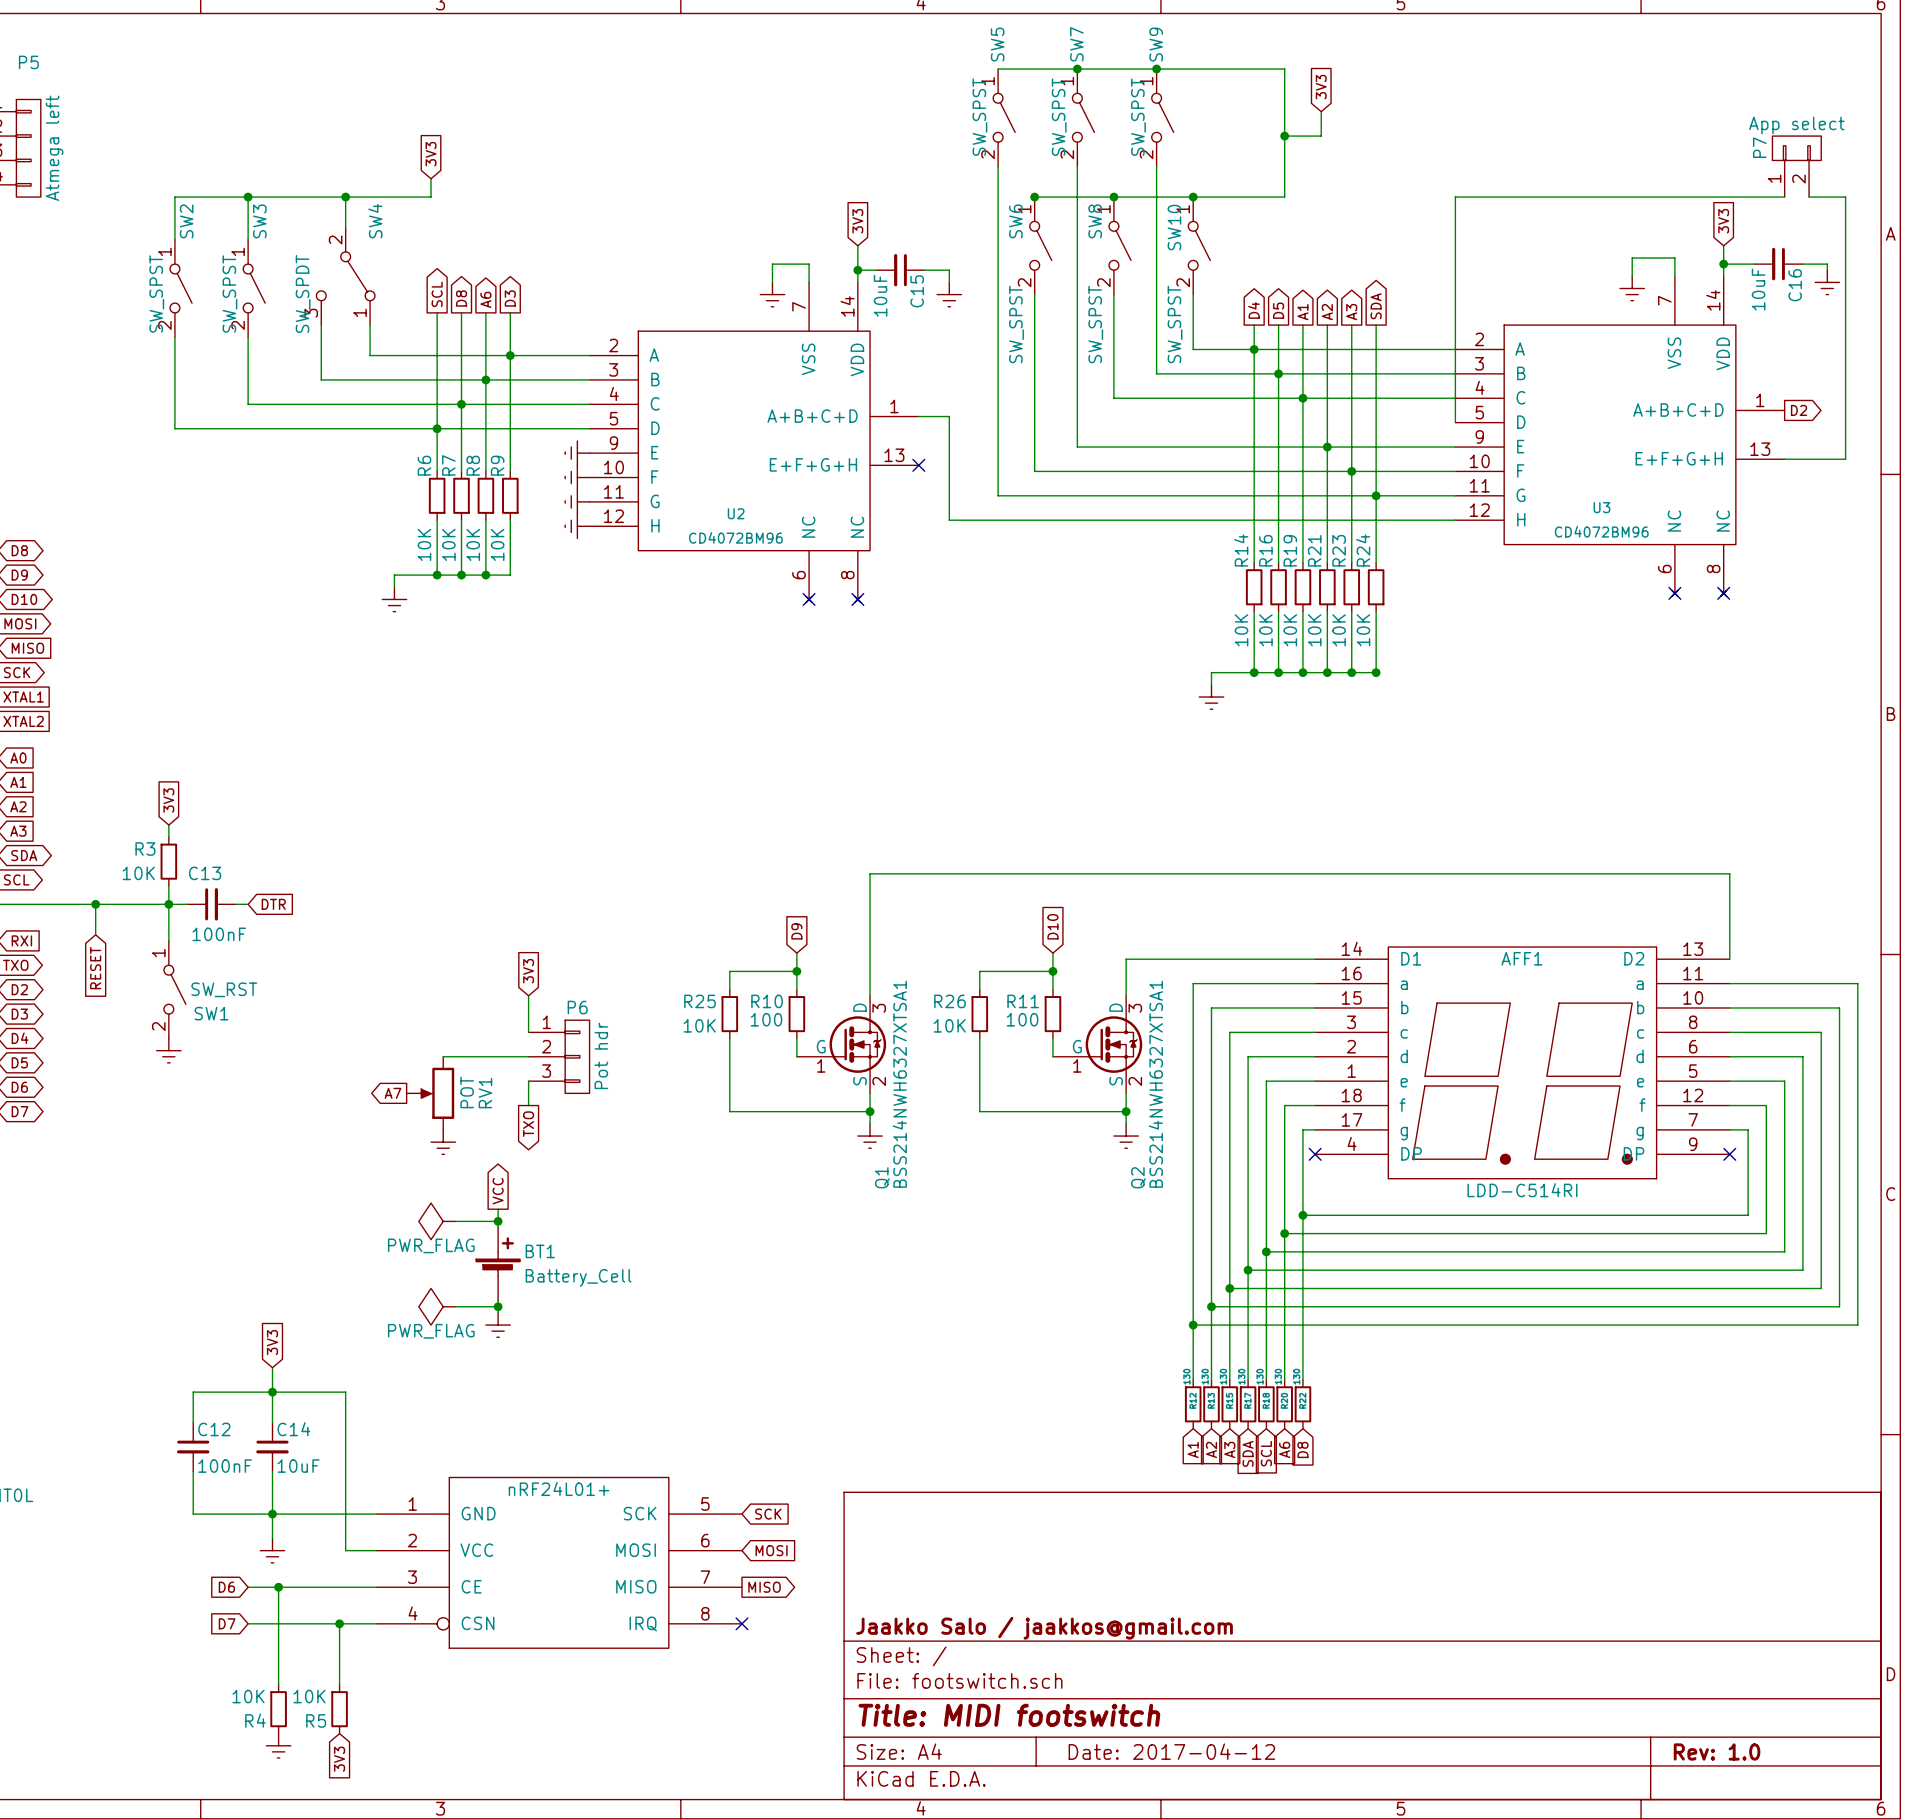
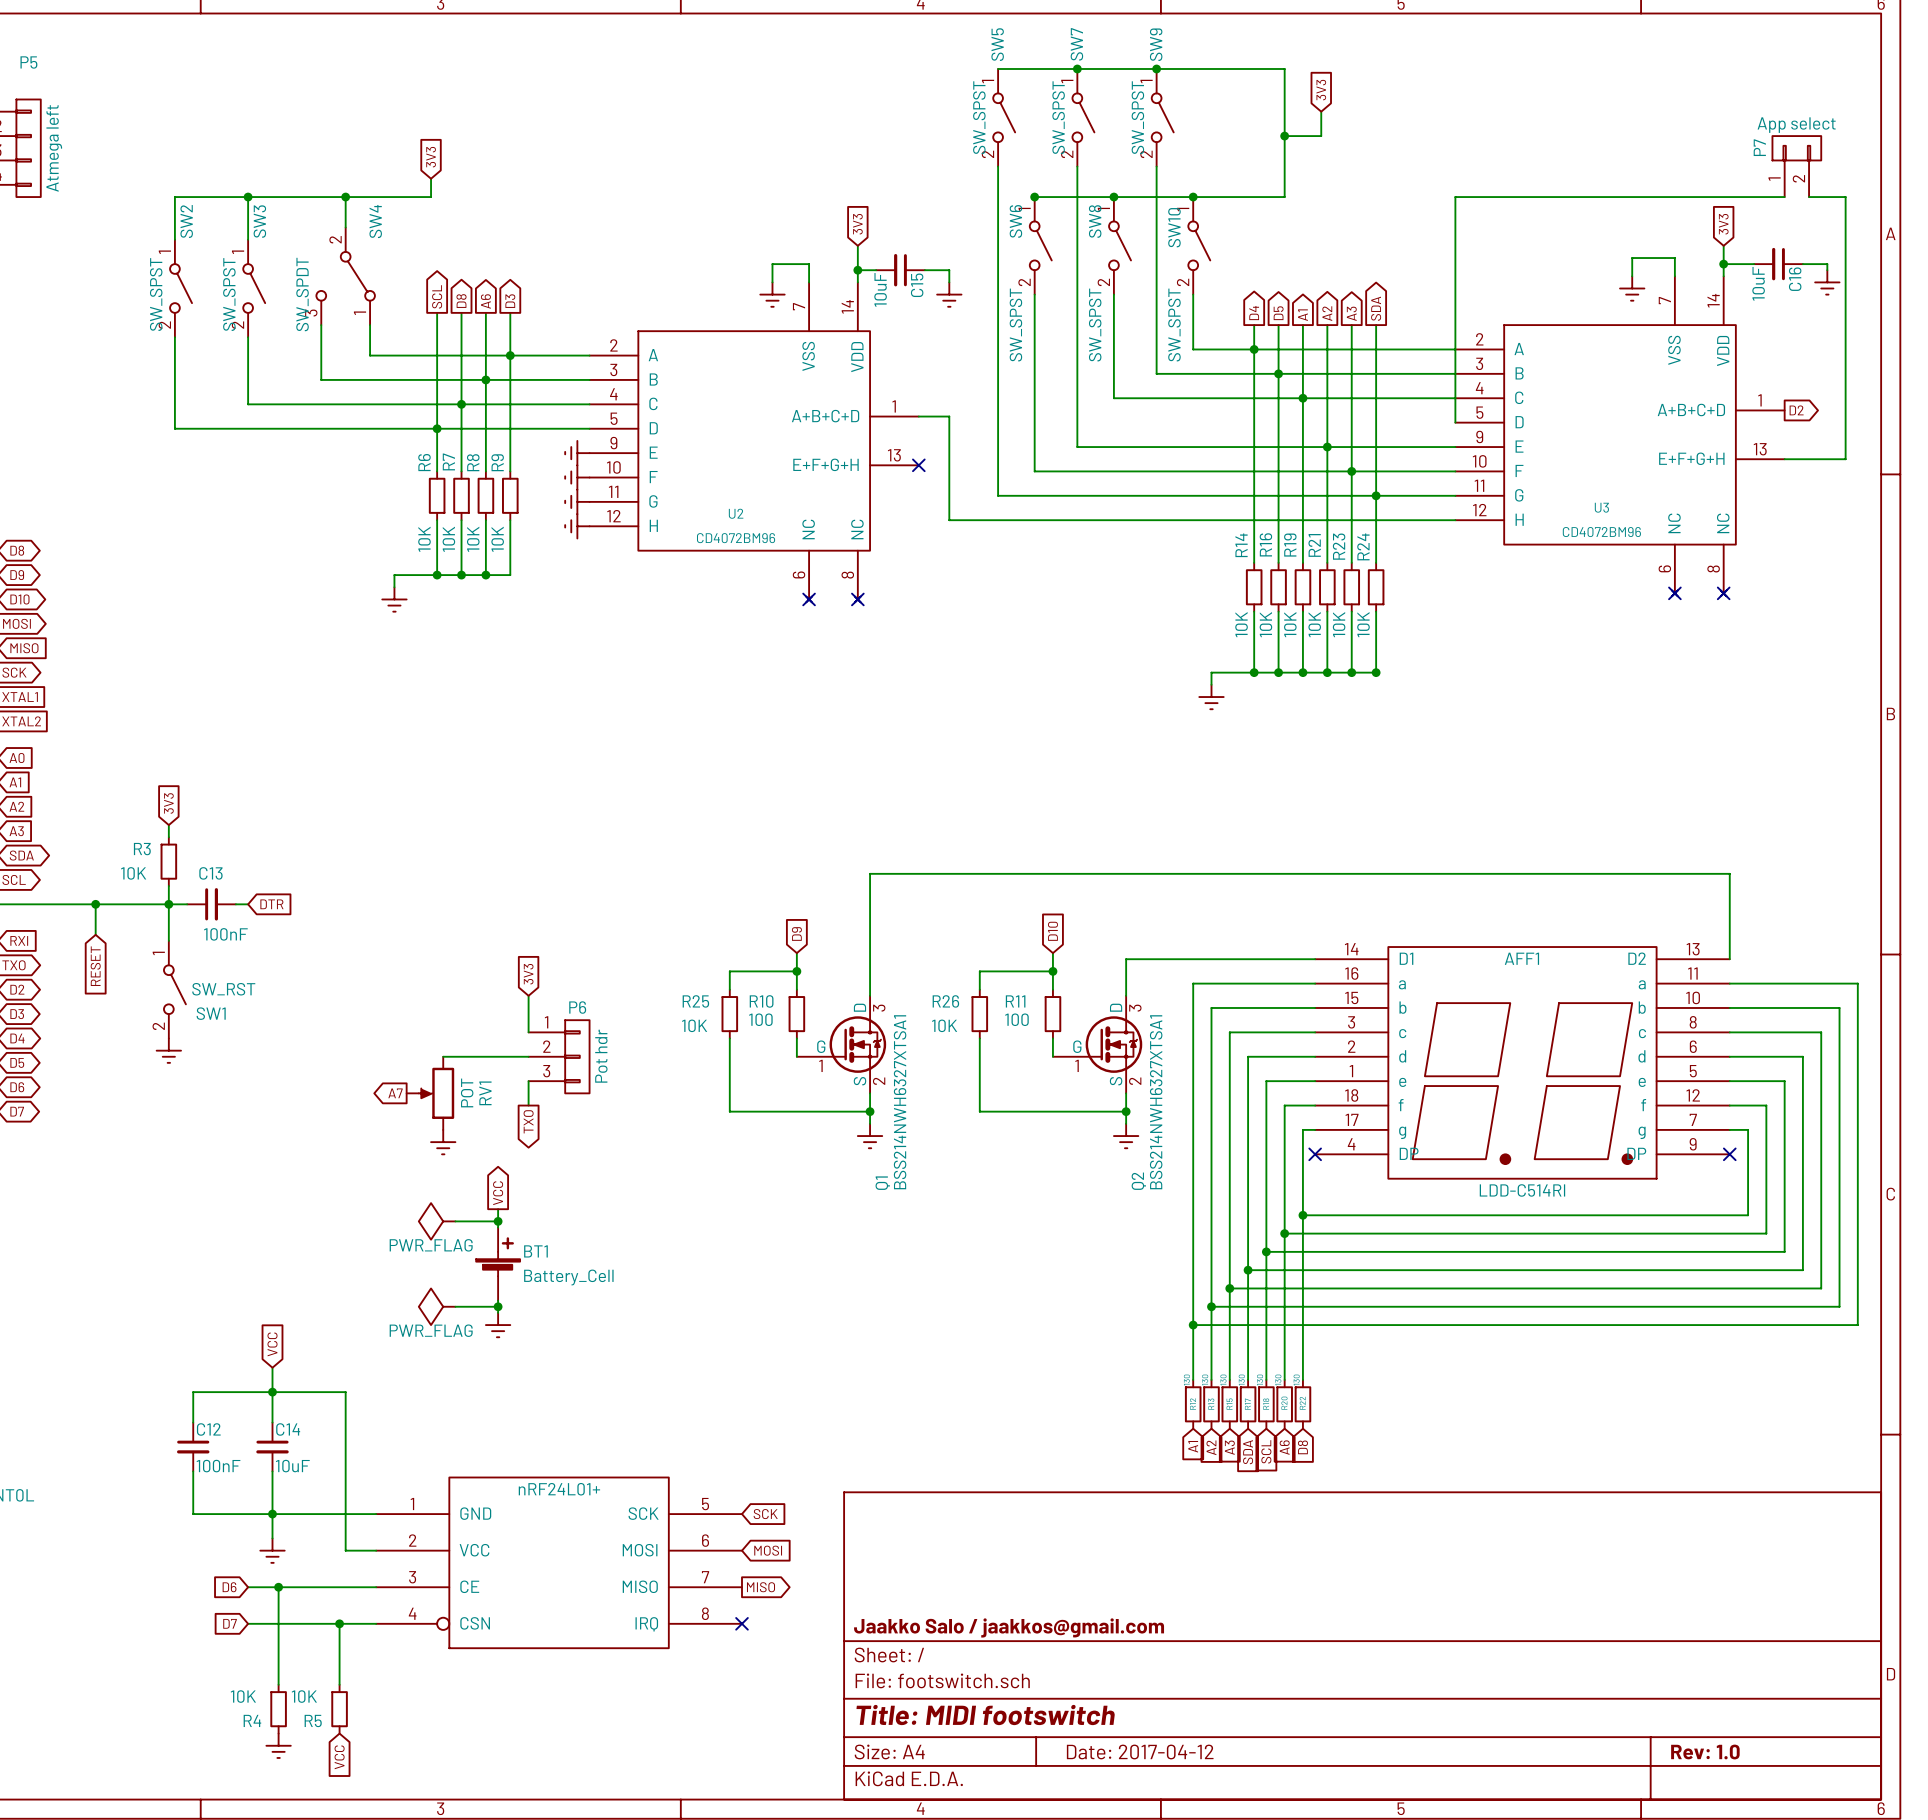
global label: 3V3 (272, 1342) -> VCC (272, 1344)
global label: 3V3 (339, 1759) -> VCC (339, 1757)

